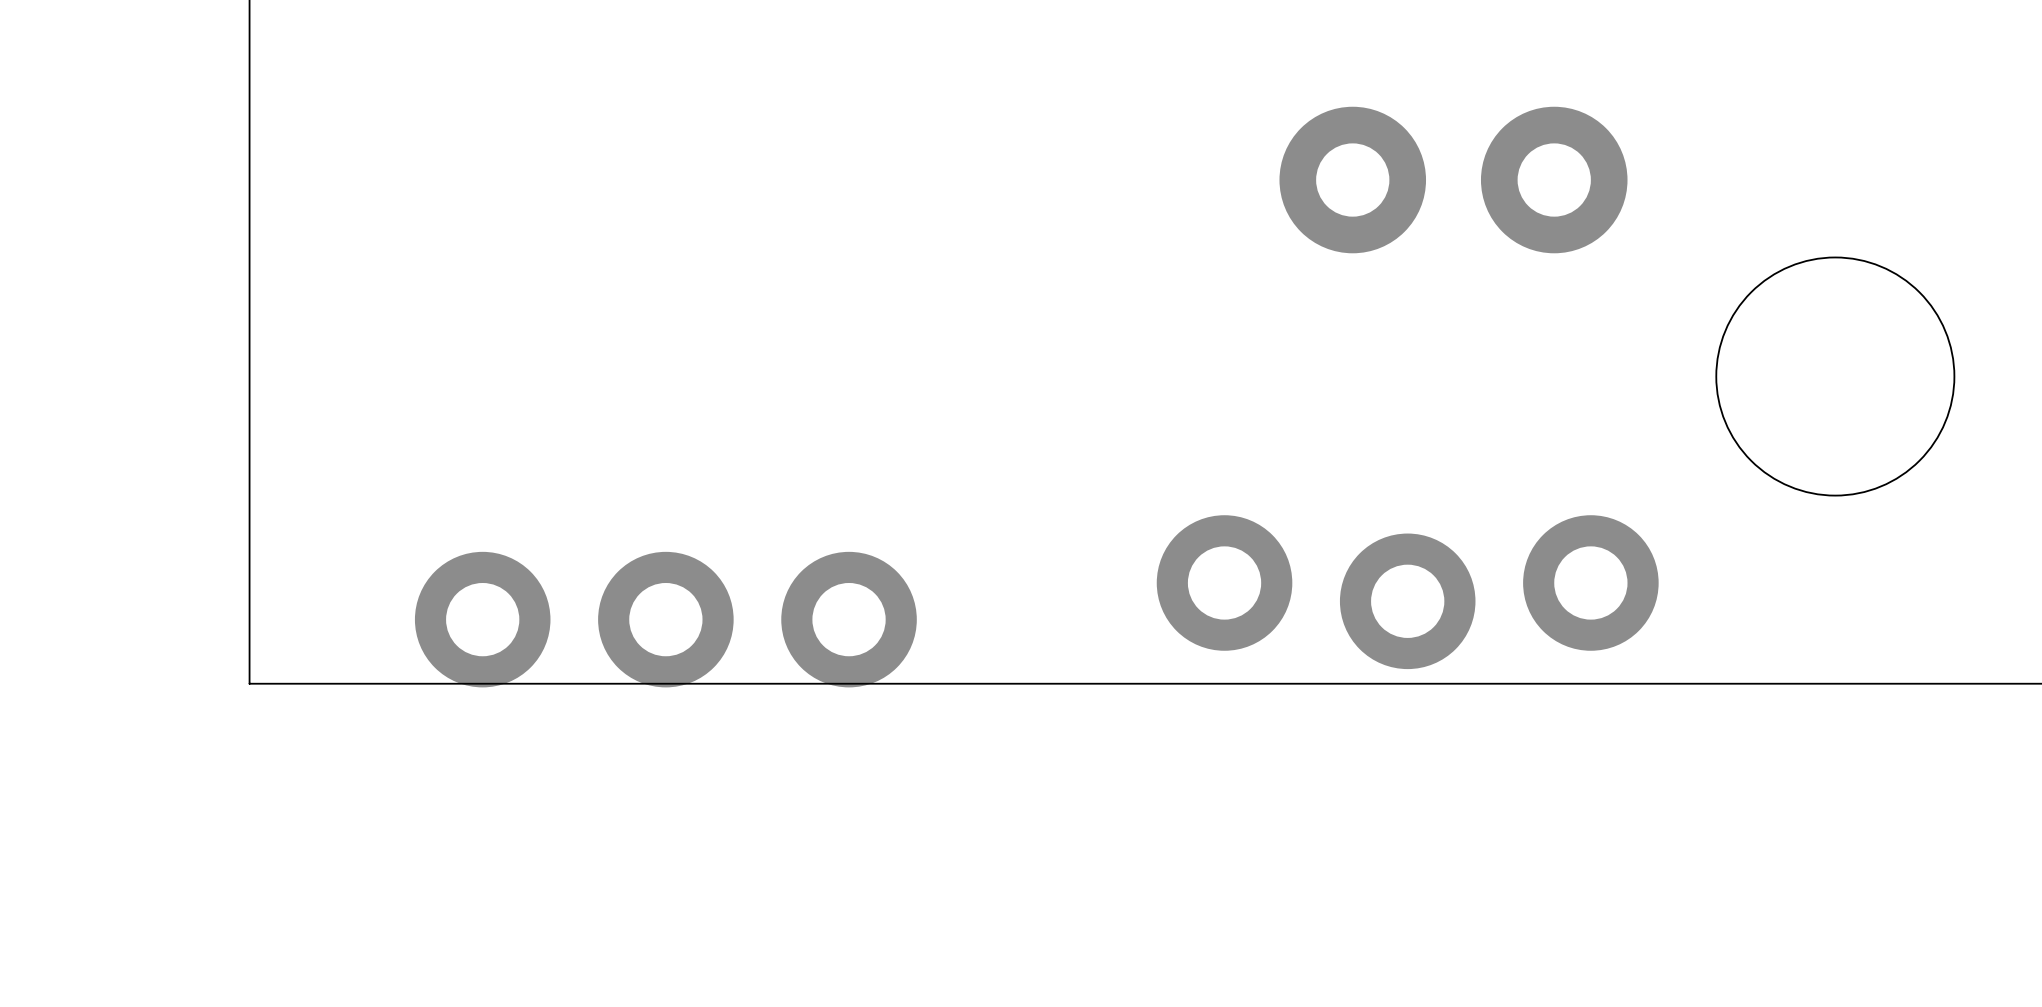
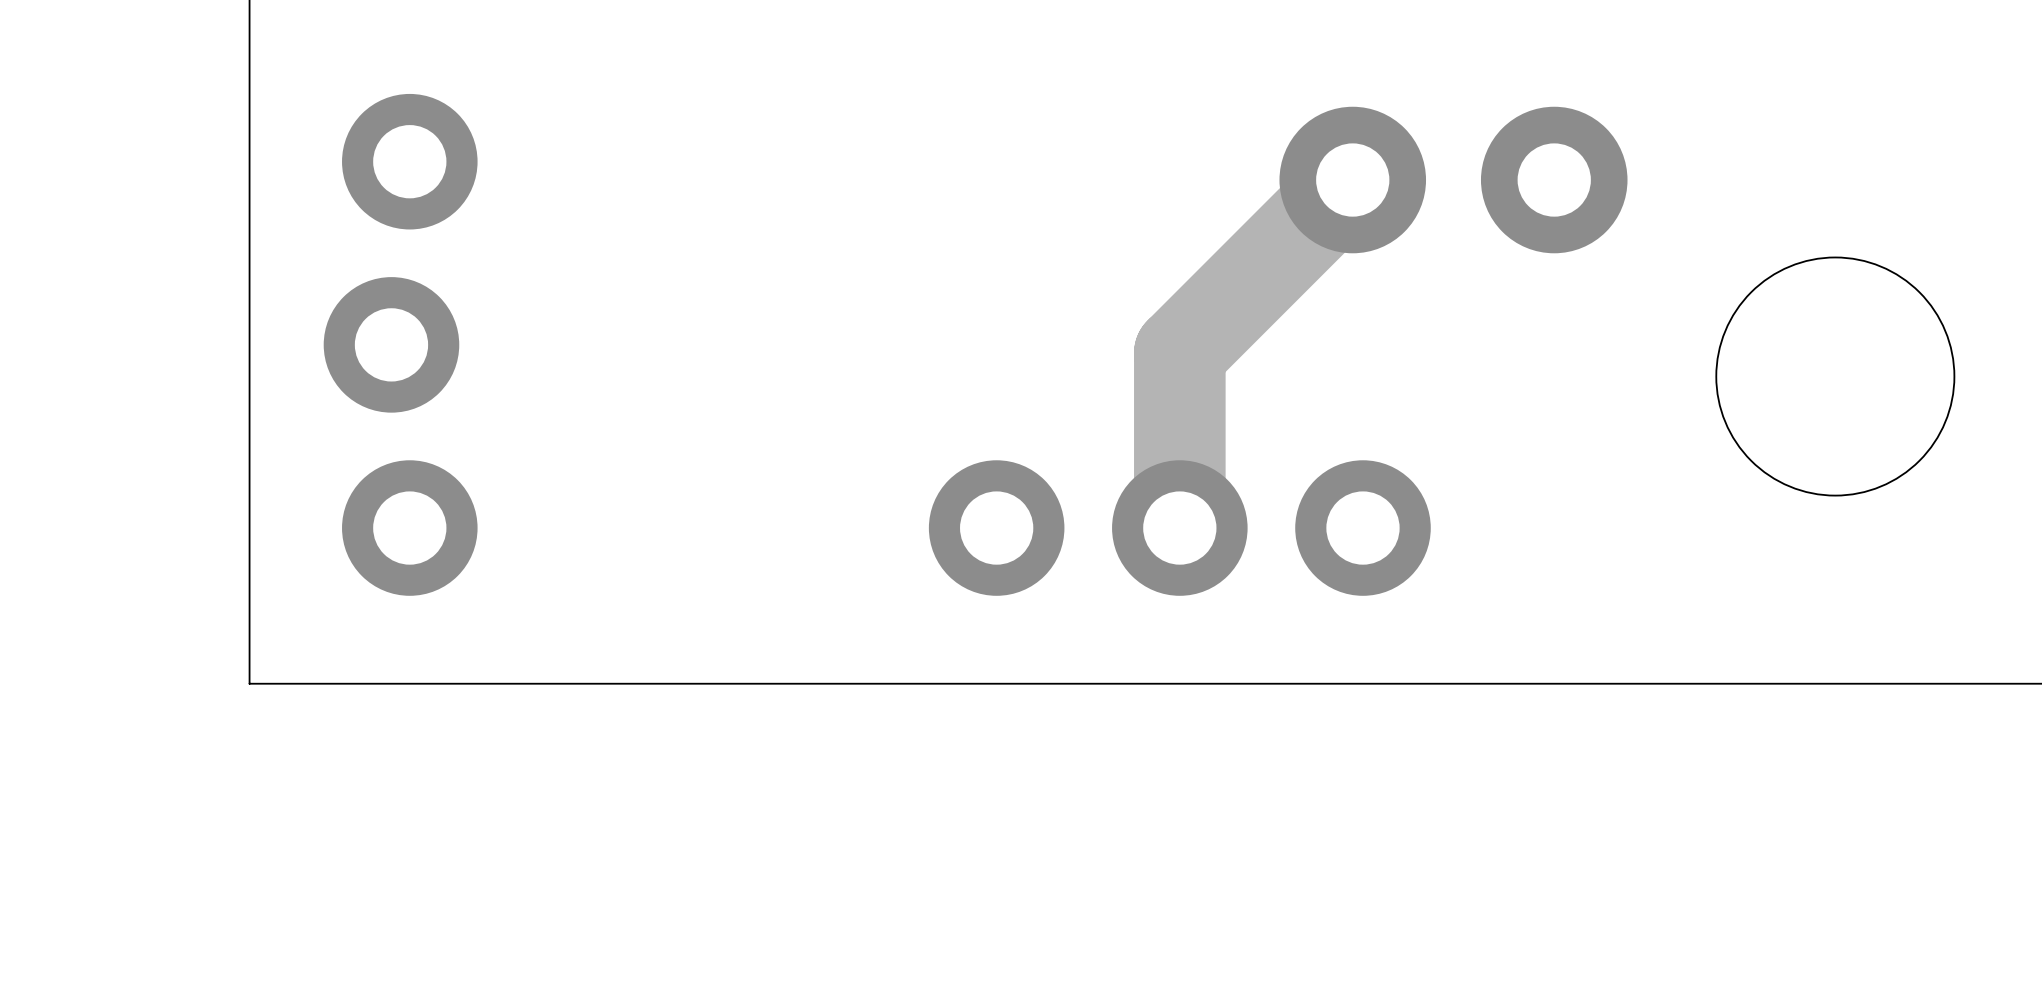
track: none -> (1352, 180) (1179, 352) (1179, 528)
part rotation: 0° (1407, 592) -> 90° clockwise (400, 344)
part position: (1407, 592) -> (400, 344)
part position: (665, 619) -> (1179, 528)

